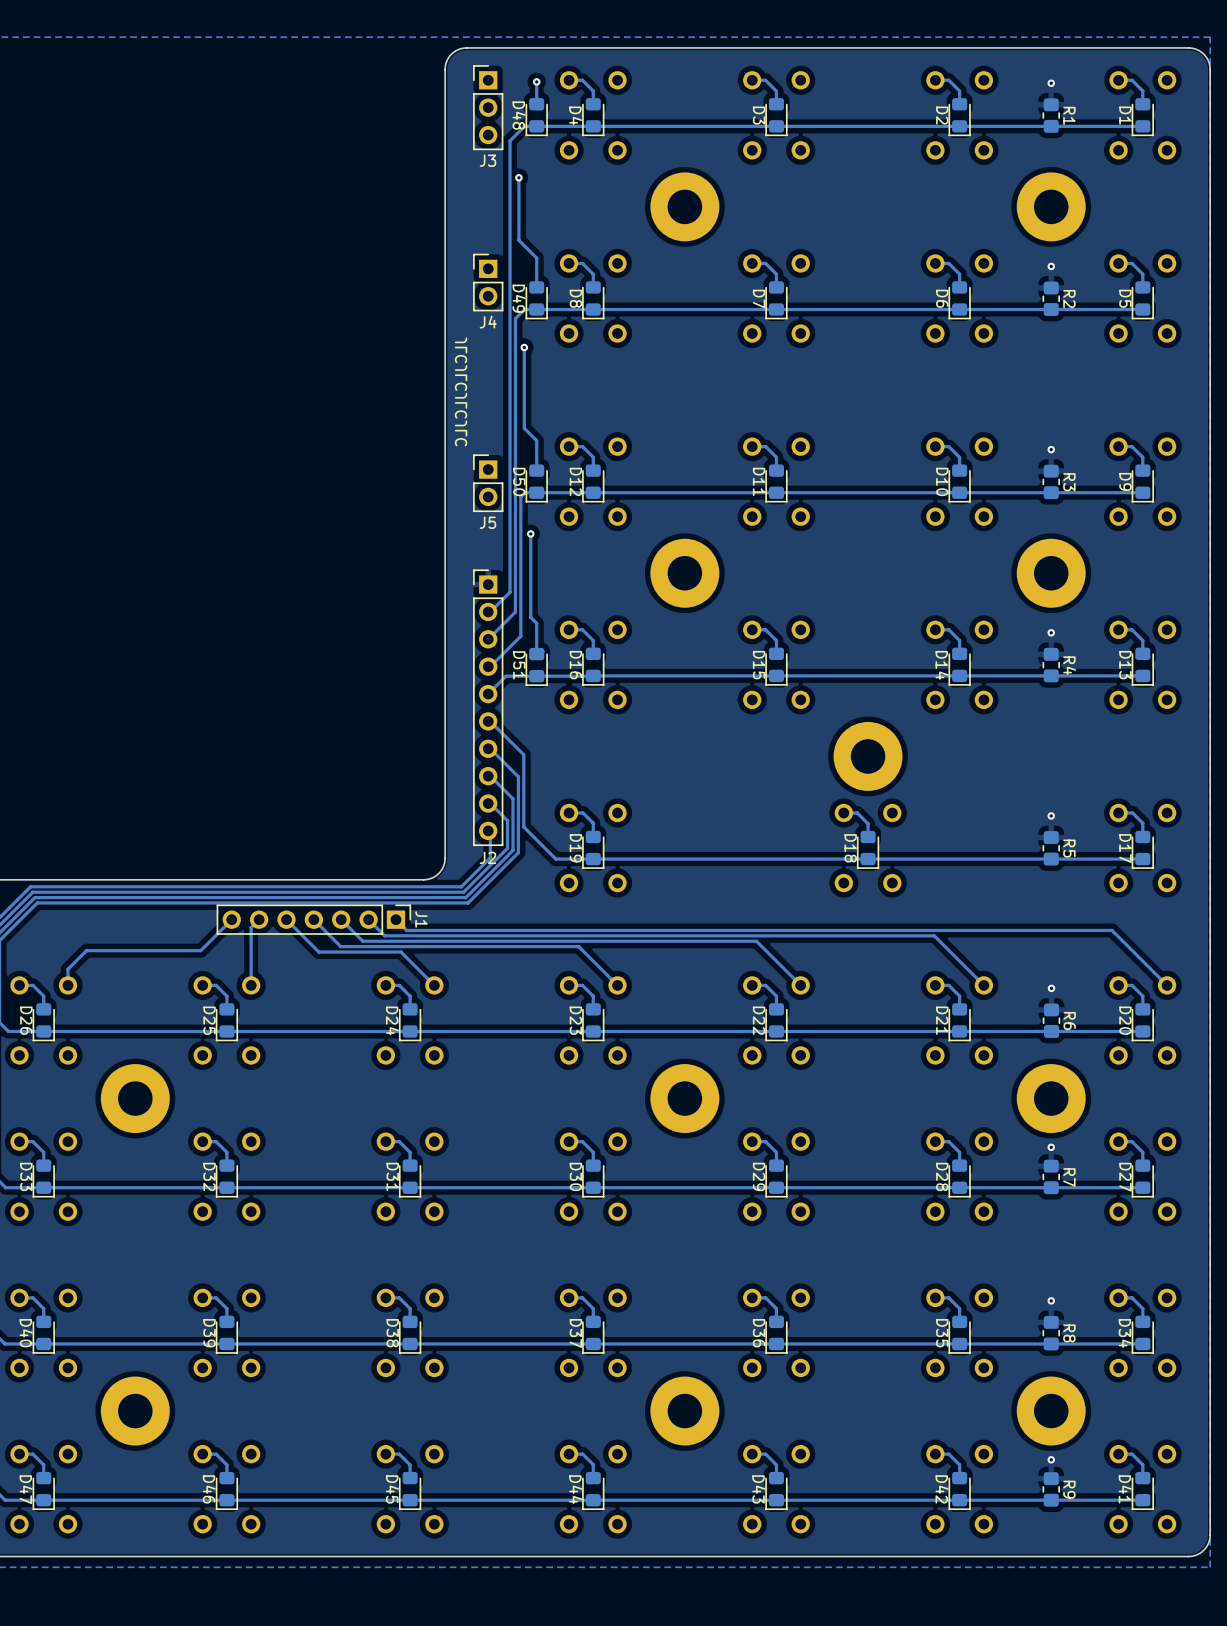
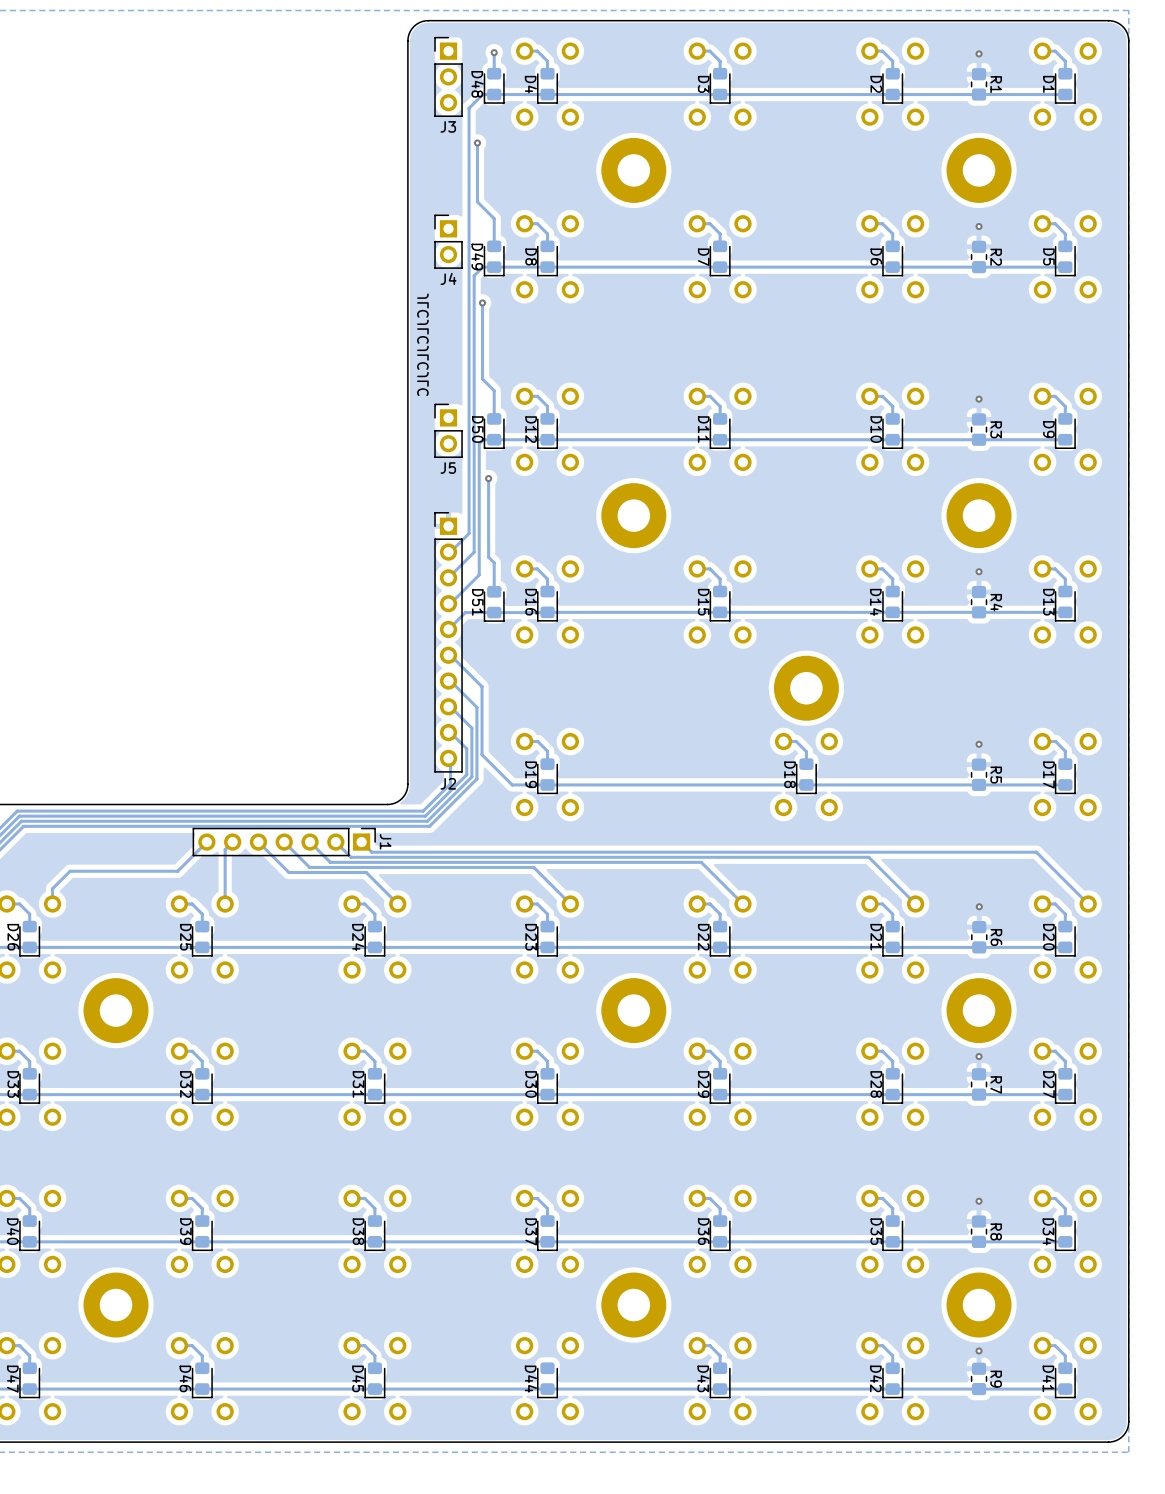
track: (569, 1454) (582, 1454) (593, 1464) (593, 1478) -> none

